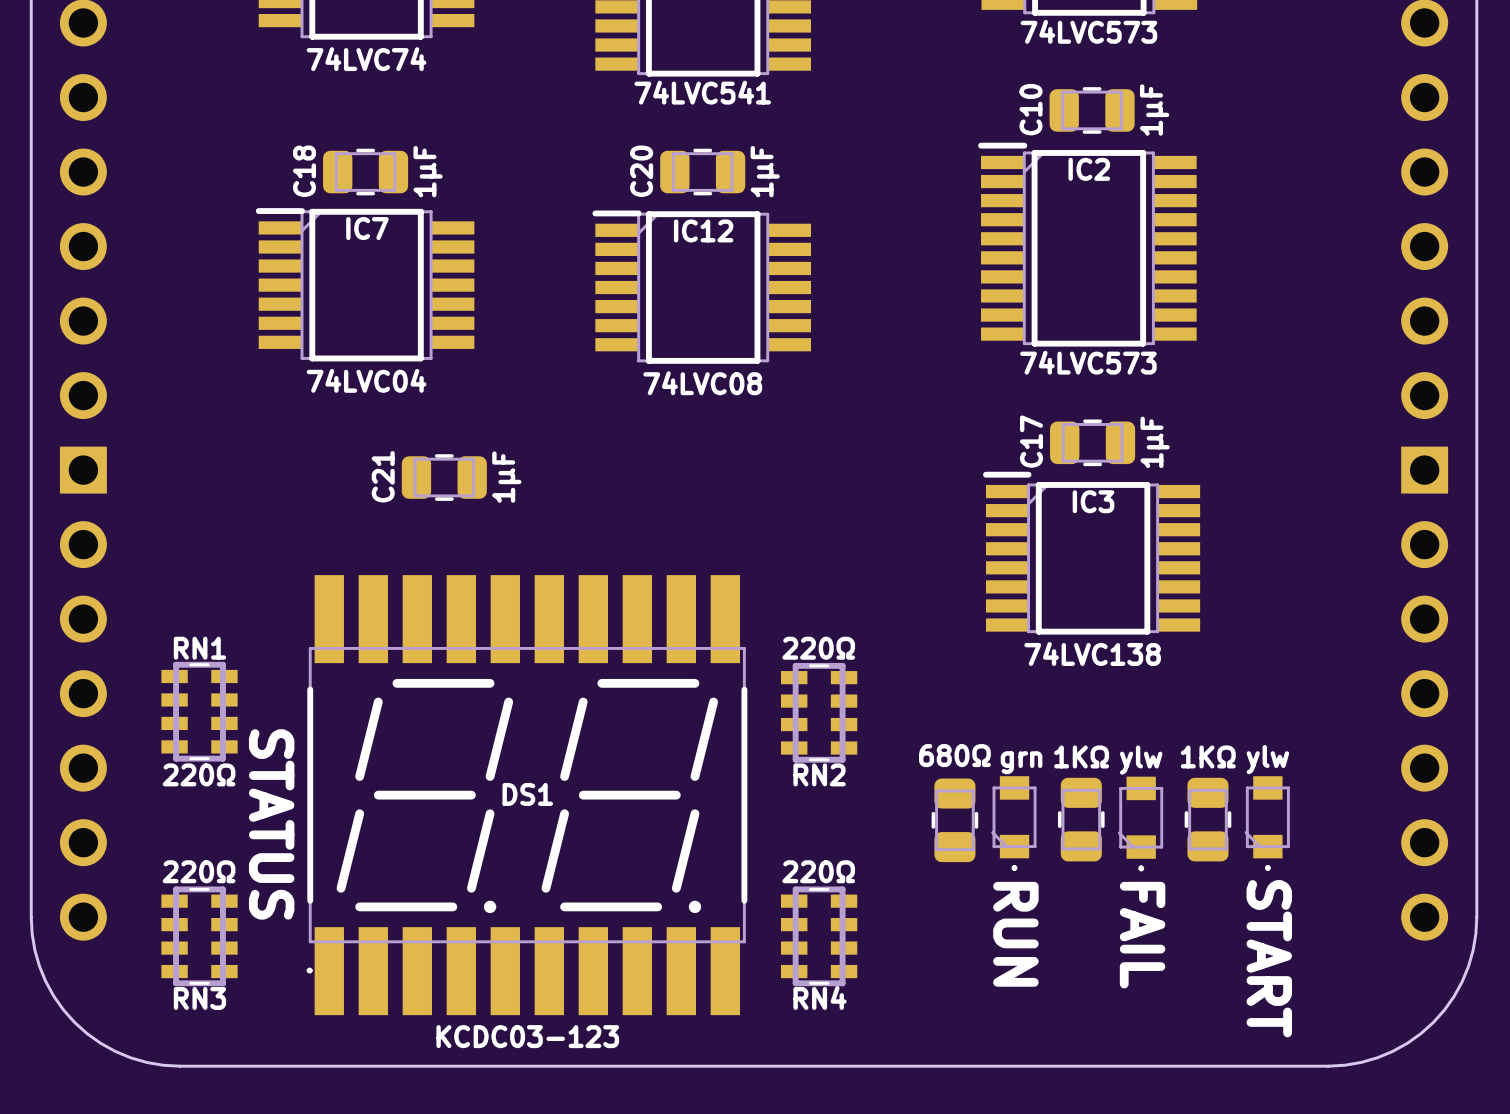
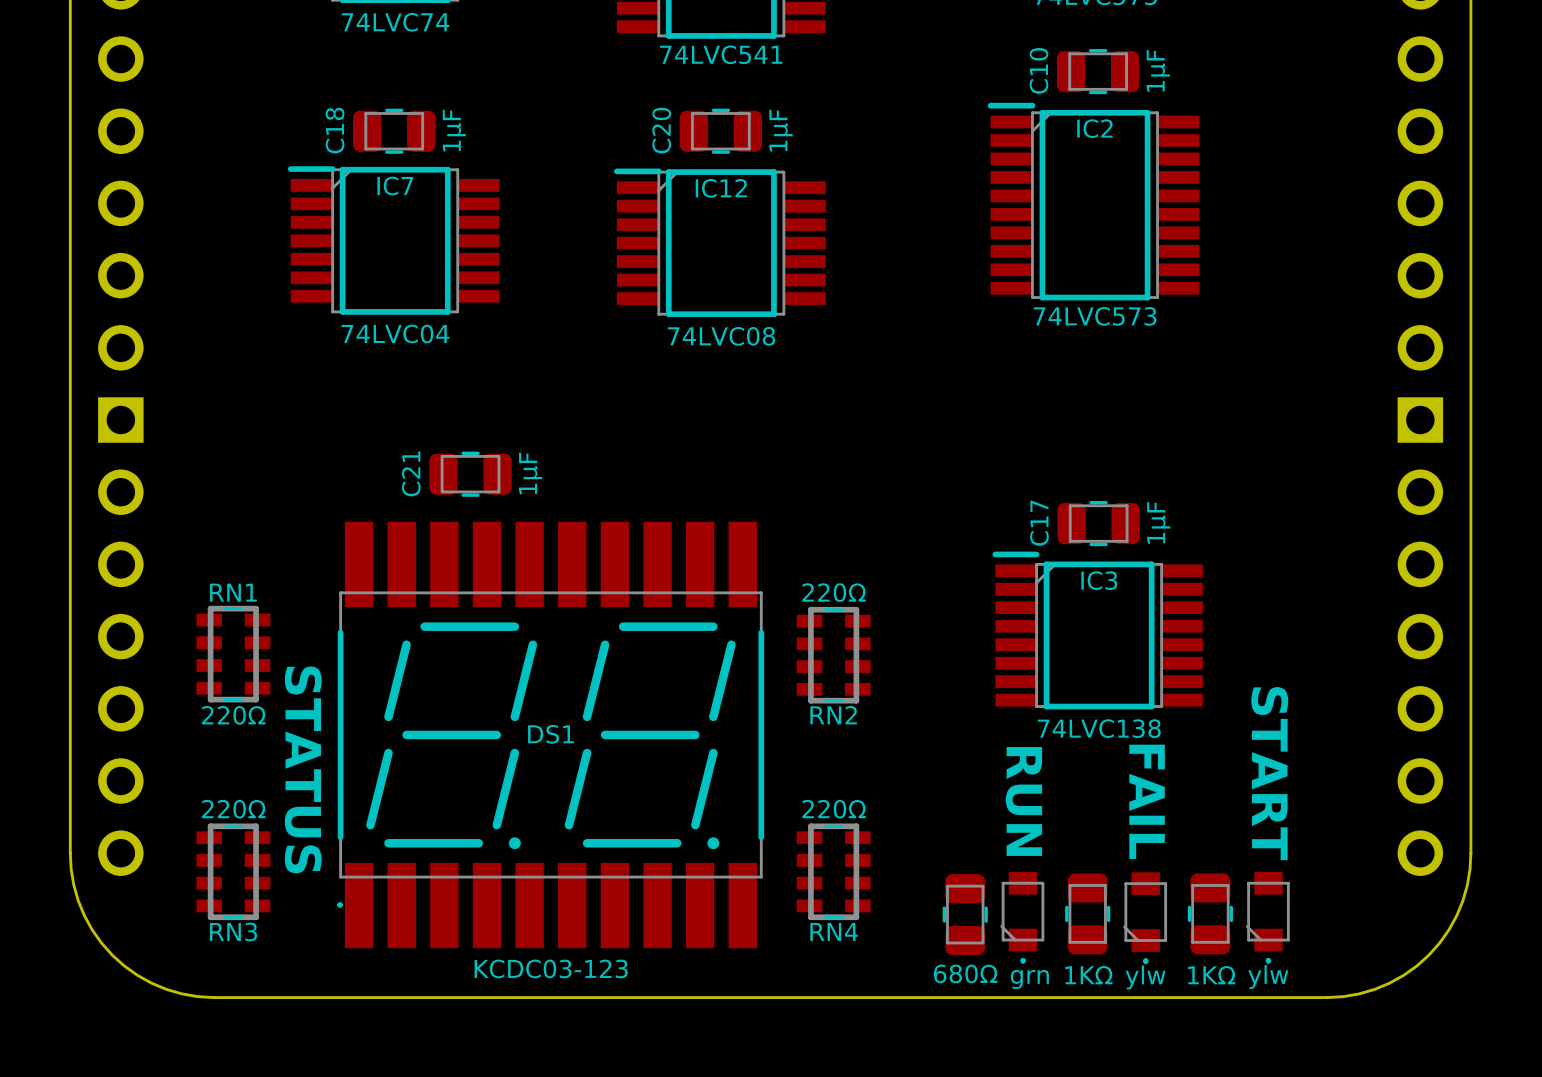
C17 position: (1092, 442) -> (1098, 523)
C21 position: (444, 477) -> (470, 474)
IC3 position: (1091, 553) -> (1097, 630)
part value position: 680Ω (954, 755) -> 680Ω (965, 973)
part text position: grn (1021, 762) -> grn (1029, 979)
part: 1KΩ (1081, 819) -> none
part: 1KΩ (1207, 819) -> none
part position: (954, 820) -> (965, 914)
part position: (1013, 823) -> (1022, 917)
part: (1140, 823) -> none
part: (1267, 823) -> none
text position: RUN (1015, 934) -> RUN (1023, 801)
text position: FAIL (1142, 935) -> FAIL (1147, 801)
text position: START (1269, 958) -> START (1269, 773)
part: none -> 1KΩ (1087, 913)
part: none -> 1KΩ (1210, 913)
part: none -> (1267, 917)
part: none -> (1145, 918)

